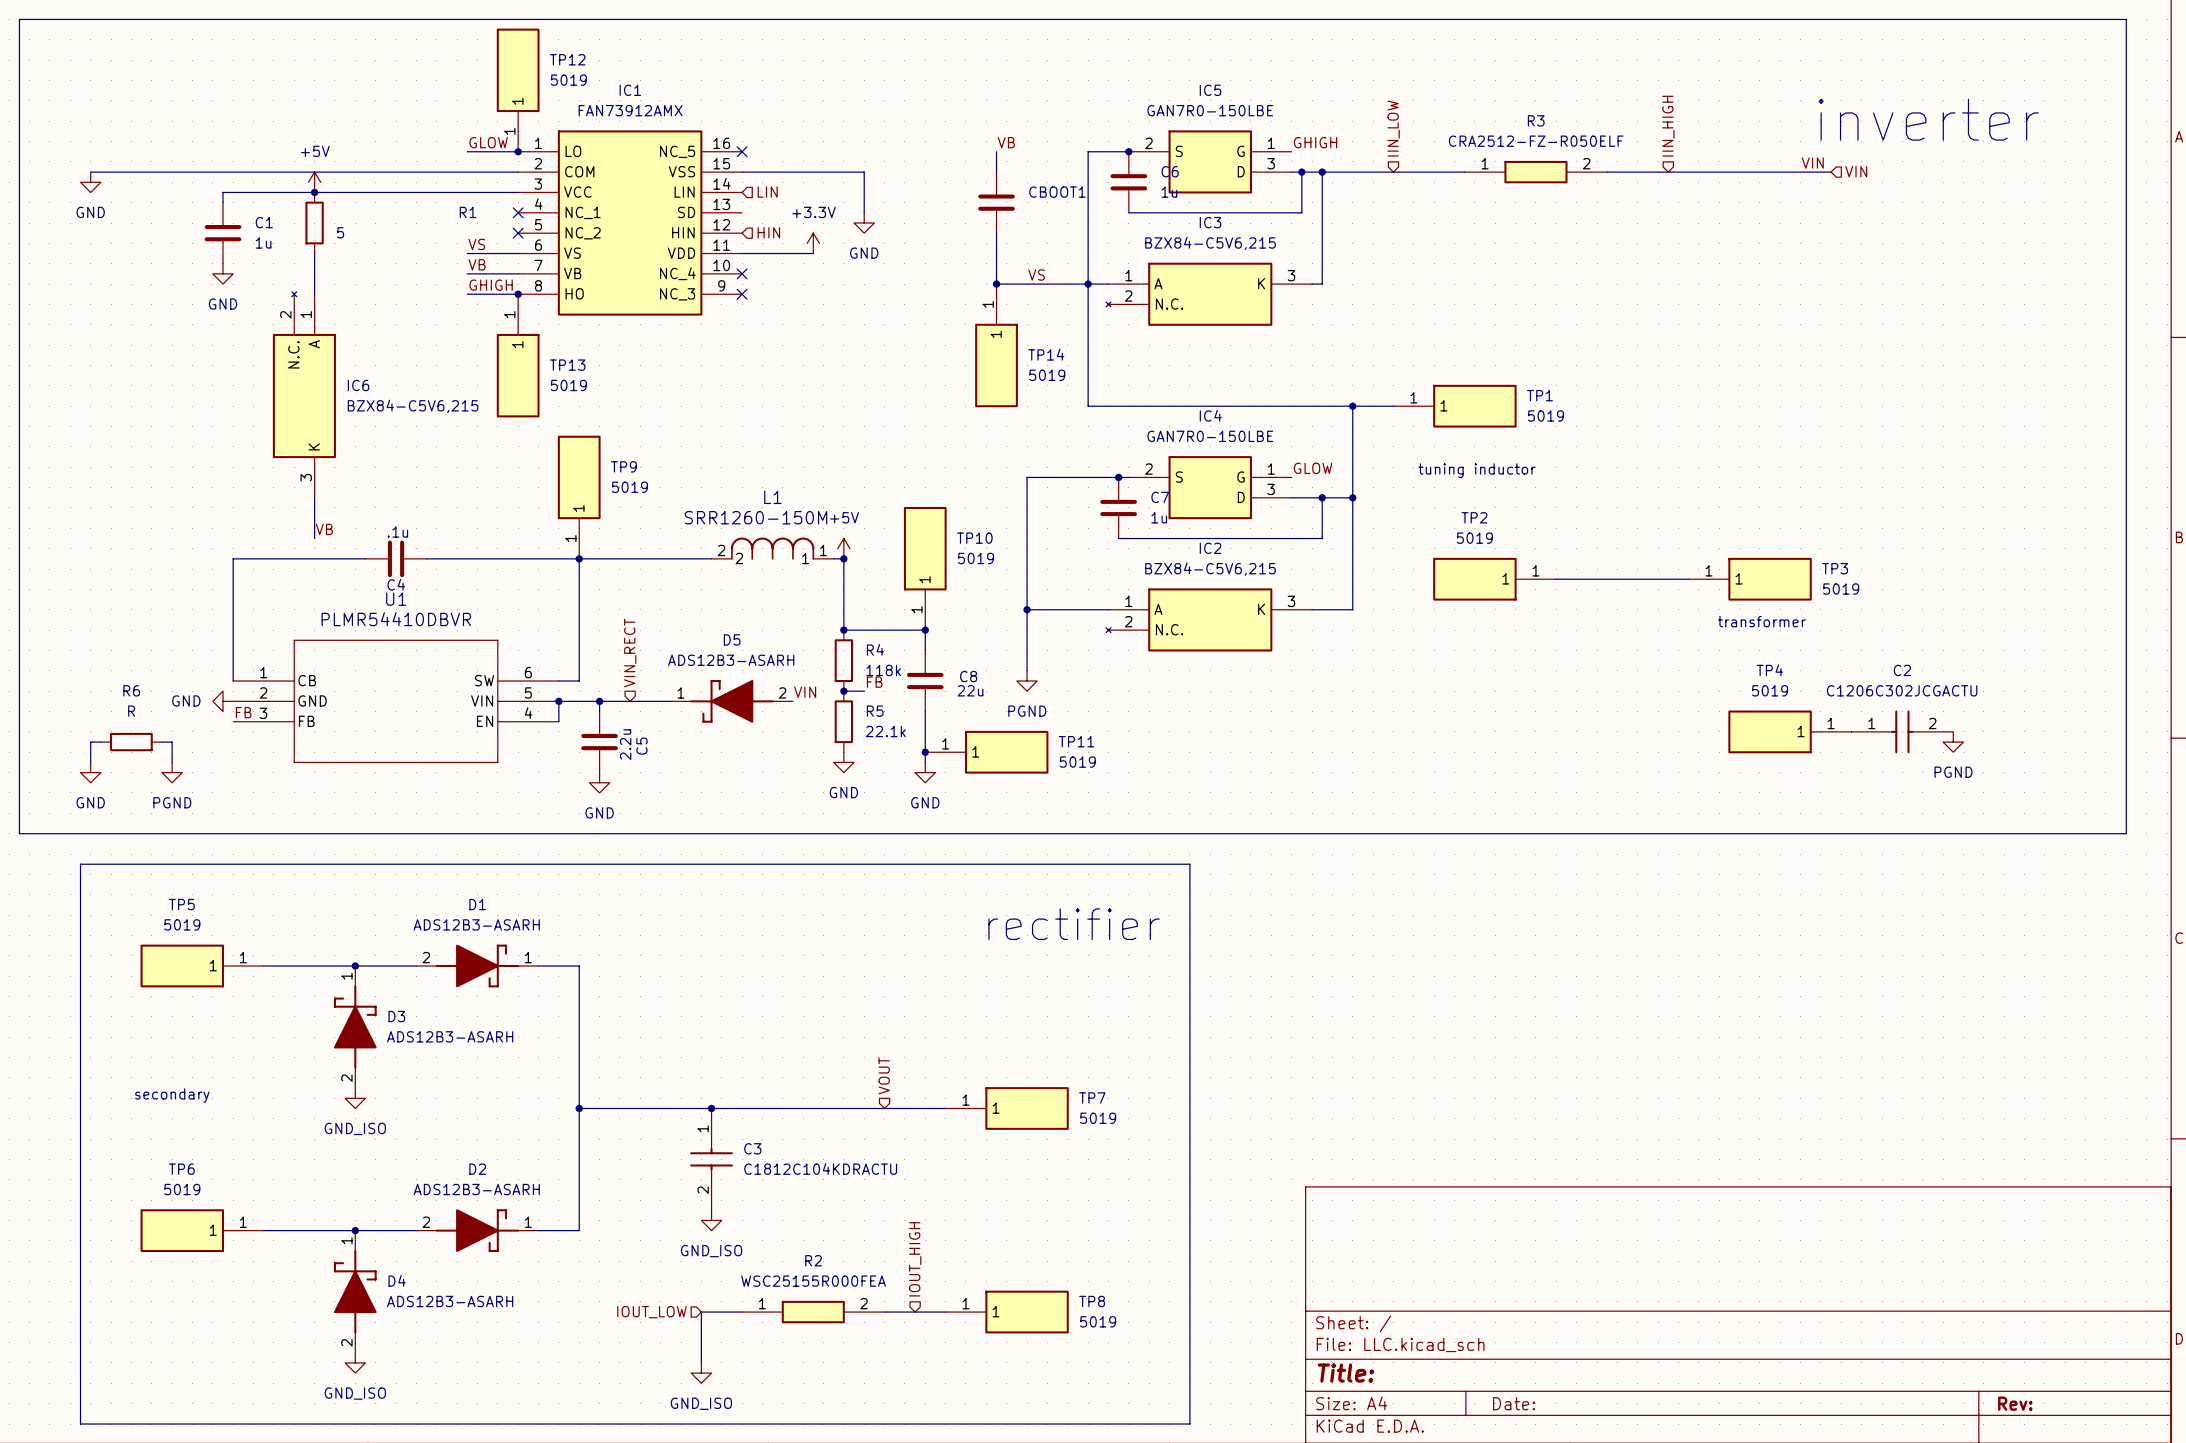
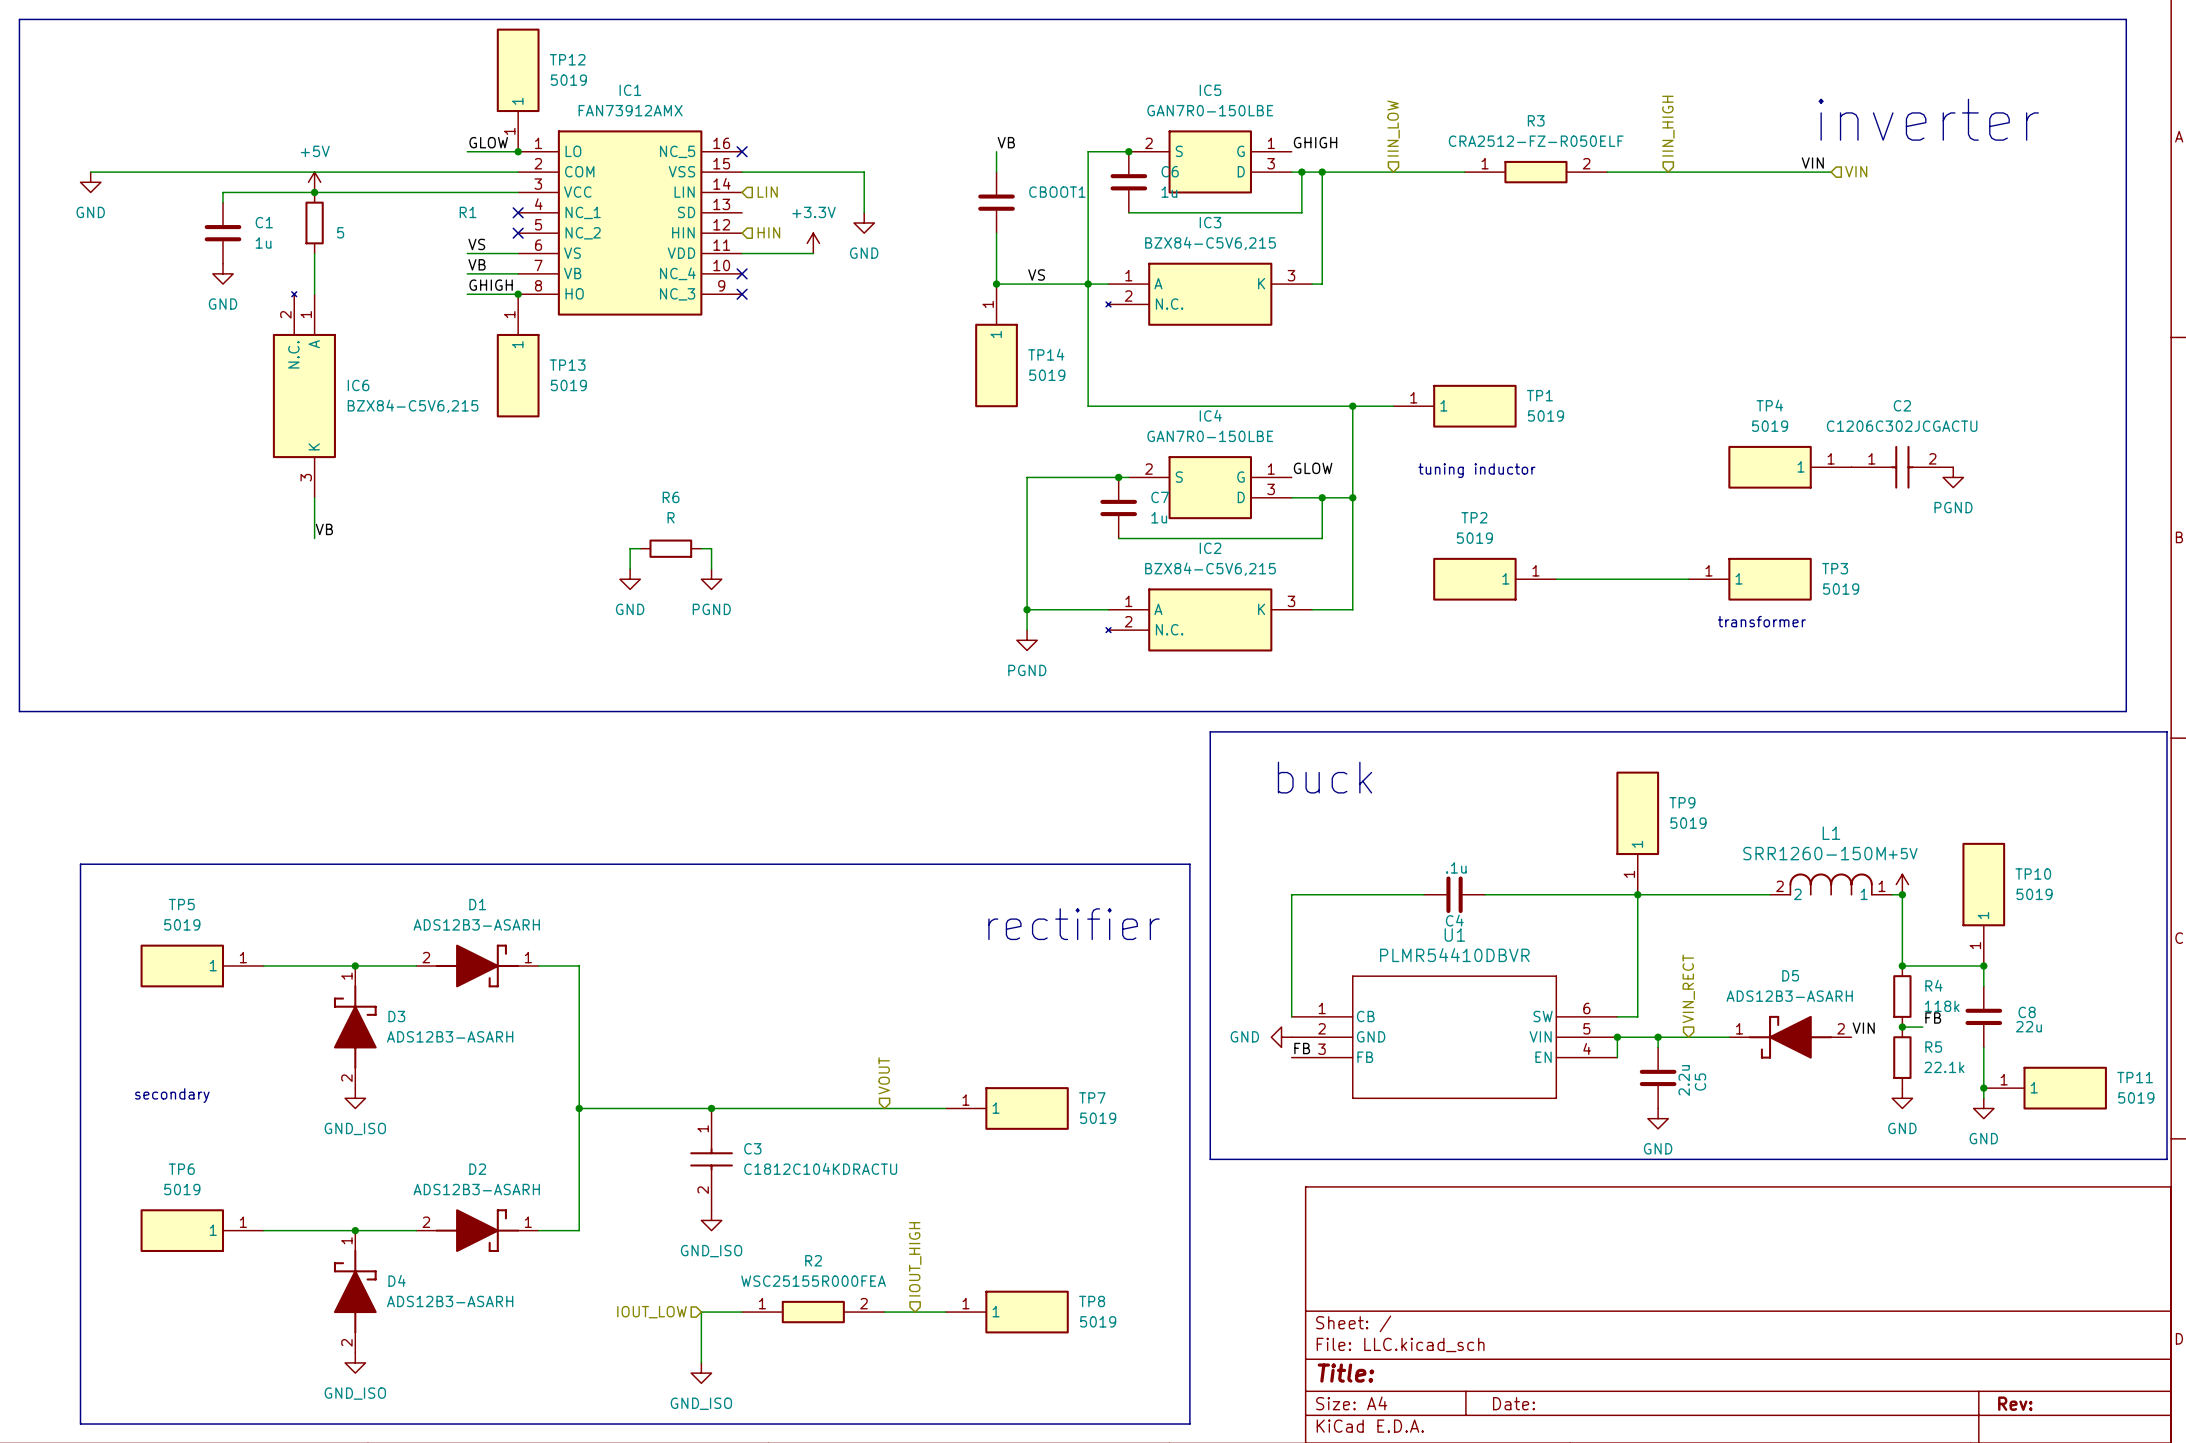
power symbol: none -> PGND (1953, 477)
TP9 position: (579, 497) -> (1637, 833)
wire: none -> (640, 548) (630, 548) (630, 569)
wire: none -> (701, 548) (711, 548) (711, 569)
L1 position: (772, 548) -> (1831, 884)
power symbol: +5V (843, 548) -> none
wire: (365, 558) (233, 558) (233, 681) -> none
C4 position: (396, 558) -> (1454, 894)
wire: (426, 558) (711, 558) -> none
wire: (579, 558) (579, 681) (558, 681) -> none
junction: (579, 558) -> none
wire: (833, 558) (843, 558) (843, 630) (925, 630) (925, 650) -> none
junction: (843, 558) -> none
TP10 position: (925, 568) -> (1983, 904)
power symbol: none -> GND (630, 579)
power symbol: none -> PGND (711, 579)
junction: (843, 630) -> none
junction: (925, 630) -> none
wire: (1027, 630) (1027, 670) -> none
hierarchical label: VIN_RECT (630, 652) -> none
R4 position: (843, 660) -> (1902, 996)
C8 position: (925, 681) -> (1983, 1016)
power symbol position: PGND (1027, 681) -> PGND (1027, 640)
label: FB (874, 682) -> none
wire: (843, 691) (864, 691) -> none
junction: (843, 691) -> none
label: VIN (805, 692) -> none
power symbol: GND (223, 701) -> none
U1 position: (396, 701) -> (1454, 1037)
junction: (558, 701) -> none
wire: (599, 701) (599, 711) -> none
junction: (599, 701) -> none
wire: (670, 701) (558, 701) (558, 721) -> none
D5 position: (731, 701) -> (1790, 1037)
line: (19, 711) (19, 833) (2126, 833) (2126, 711) -> (19, 711) (2126, 711)
wire: (925, 711) (925, 762) -> none
label: FB (243, 712) -> none
R5 position: (843, 721) -> (1902, 1057)
line: none -> (1210, 731) (2167, 731) (2167, 1159) (1210, 1159) (1210, 731)
TP4 position: (1789, 731) -> (1789, 467)
C2 position: (1902, 731) -> (1902, 467)
wire: (100, 742) (90, 742) (90, 762) -> none
R6 position: (131, 742) -> (670, 548)
wire: (161, 742) (172, 742) (172, 762) -> none
C5 position: (599, 742) -> (1658, 1077)
power symbol: PGND (1953, 742) -> none
junction: (925, 752) -> none
TP11 position: (986, 752) -> (2045, 1088)
power symbol: GND (843, 762) -> none
power symbol: GND (90, 772) -> none
power symbol: PGND (172, 772) -> none
power symbol: GND (925, 772) -> none
text: none -> buck (1324, 777)
power symbol: GND (599, 782) -> none
power symbol: none -> +5V (1902, 884)
wire: none -> (1424, 894) (1291, 894) (1291, 1016)
wire: none -> (1485, 894) (1770, 894)
wire: none -> (1637, 894) (1637, 1016) (1617, 1016)
junction: none -> (1637, 894)
wire: none -> (1892, 894) (1902, 894) (1902, 965) (1983, 965) (1983, 986)
junction: none -> (1902, 894)
junction: none -> (1902, 965)
junction: none -> (1983, 965)
hierarchical label: none -> VIN_RECT (1688, 988)
label: none -> FB (1933, 1017)
wire: none -> (1902, 1027) (1922, 1027)
junction: none -> (1902, 1027)
label: none -> VIN (1863, 1028)
power symbol: none -> GND (1281, 1037)
junction: none -> (1617, 1037)
wire: none -> (1658, 1037) (1658, 1047)
junction: none -> (1658, 1037)
wire: none -> (1729, 1037) (1617, 1037) (1617, 1057)
wire: none -> (1983, 1047) (1983, 1098)
label: none -> FB (1302, 1048)
junction: none -> (1983, 1088)
power symbol: none -> GND (1902, 1098)
power symbol: none -> GND (1983, 1108)
power symbol: none -> GND (1658, 1118)

